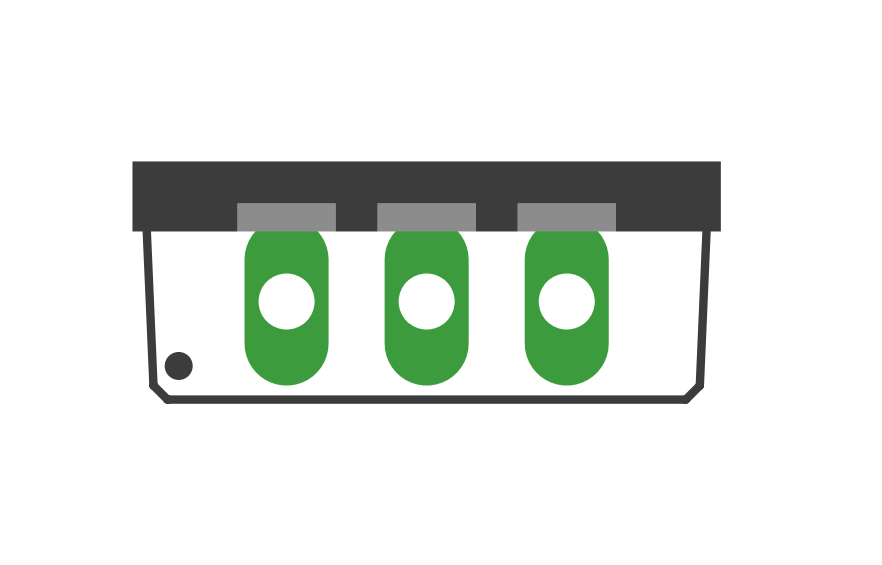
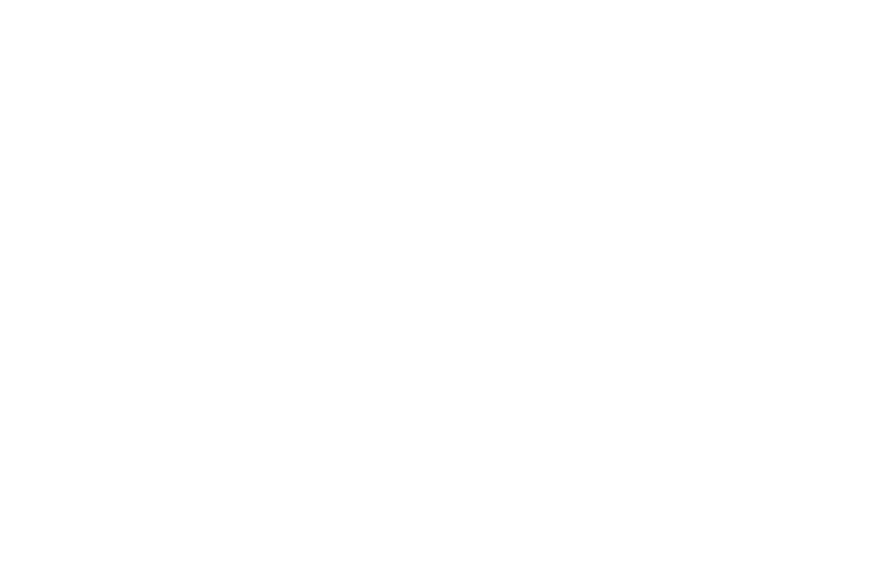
part: (426, 282) -> none

